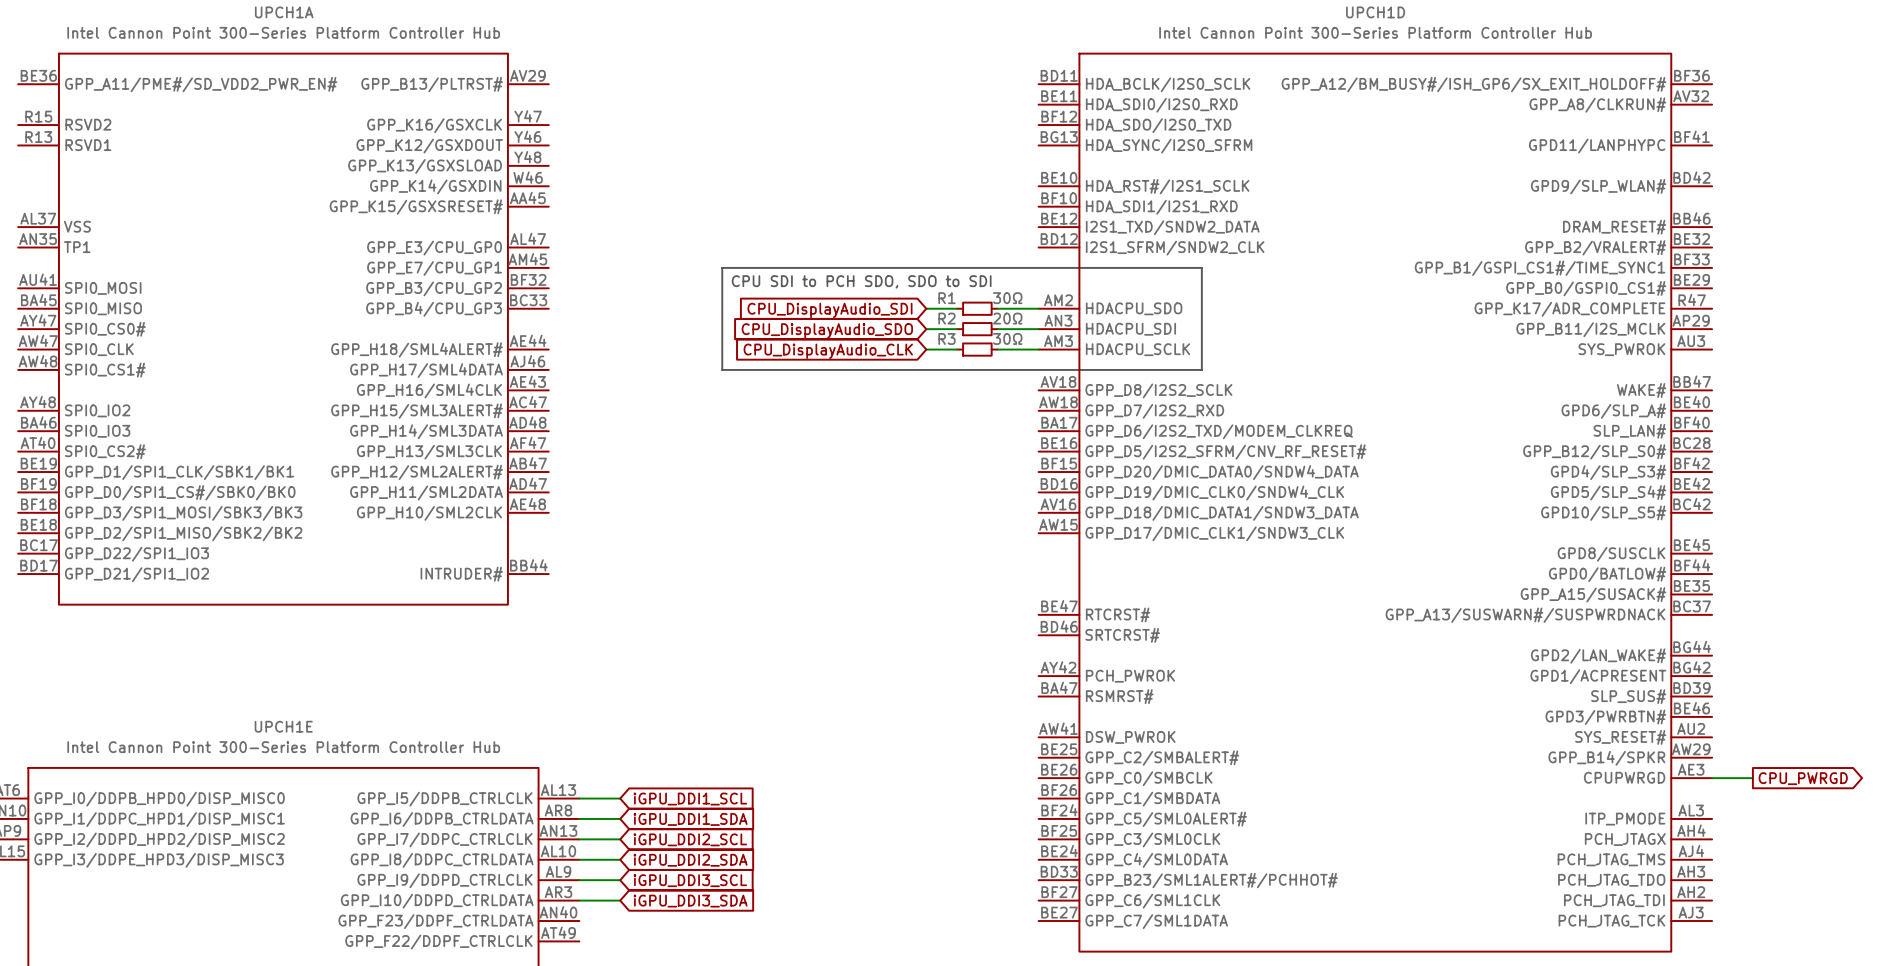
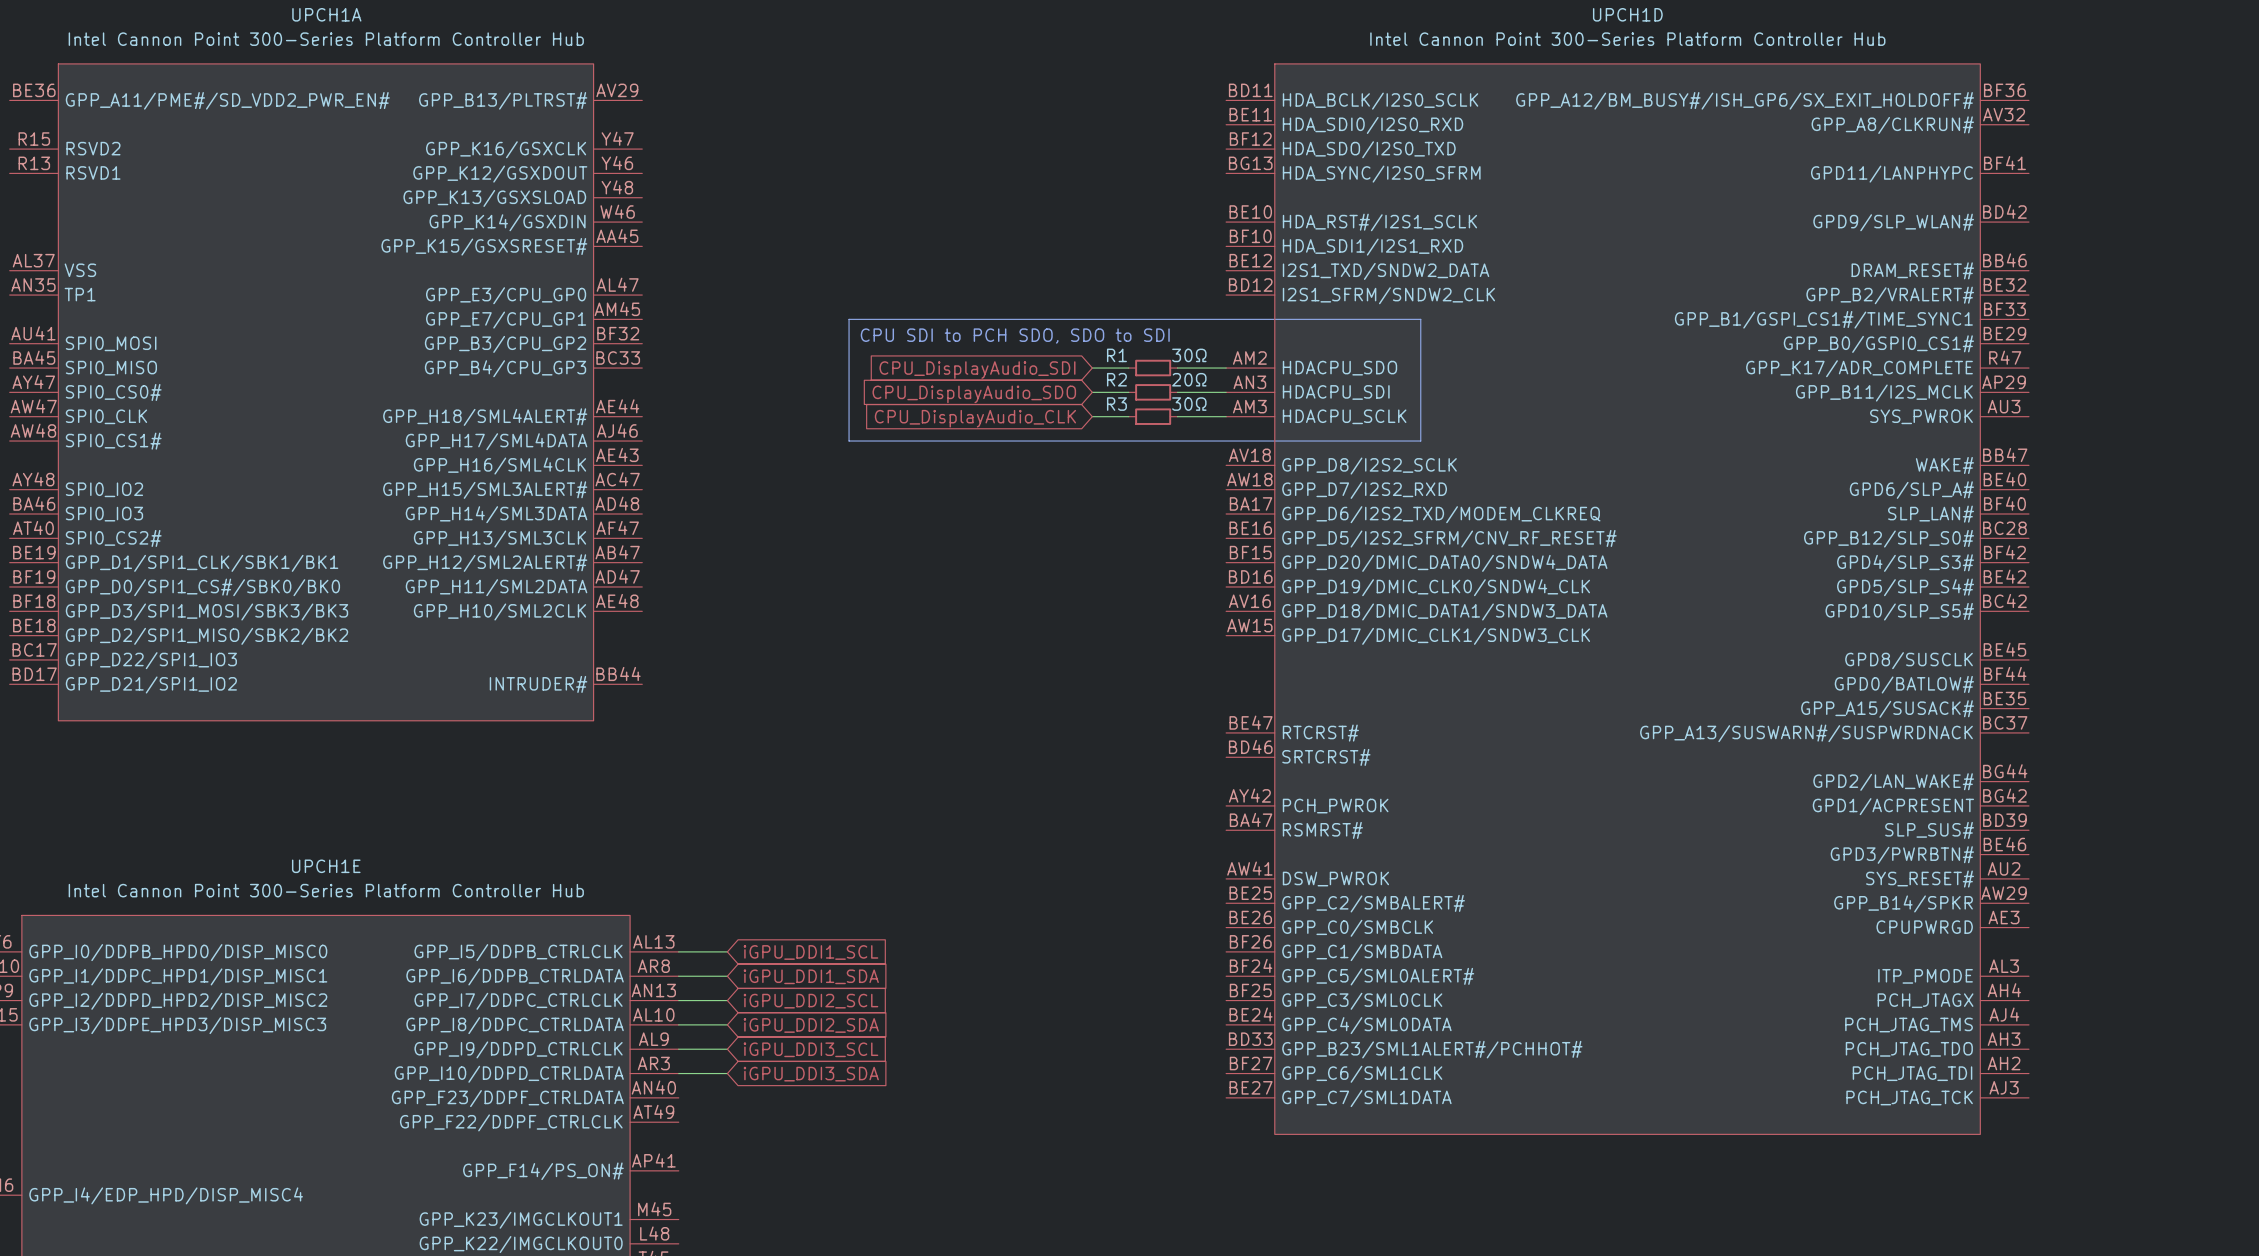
wire: (1712, 778) (1752, 778) -> none
global label: CPU_PWRGD (1803, 778) -> none

